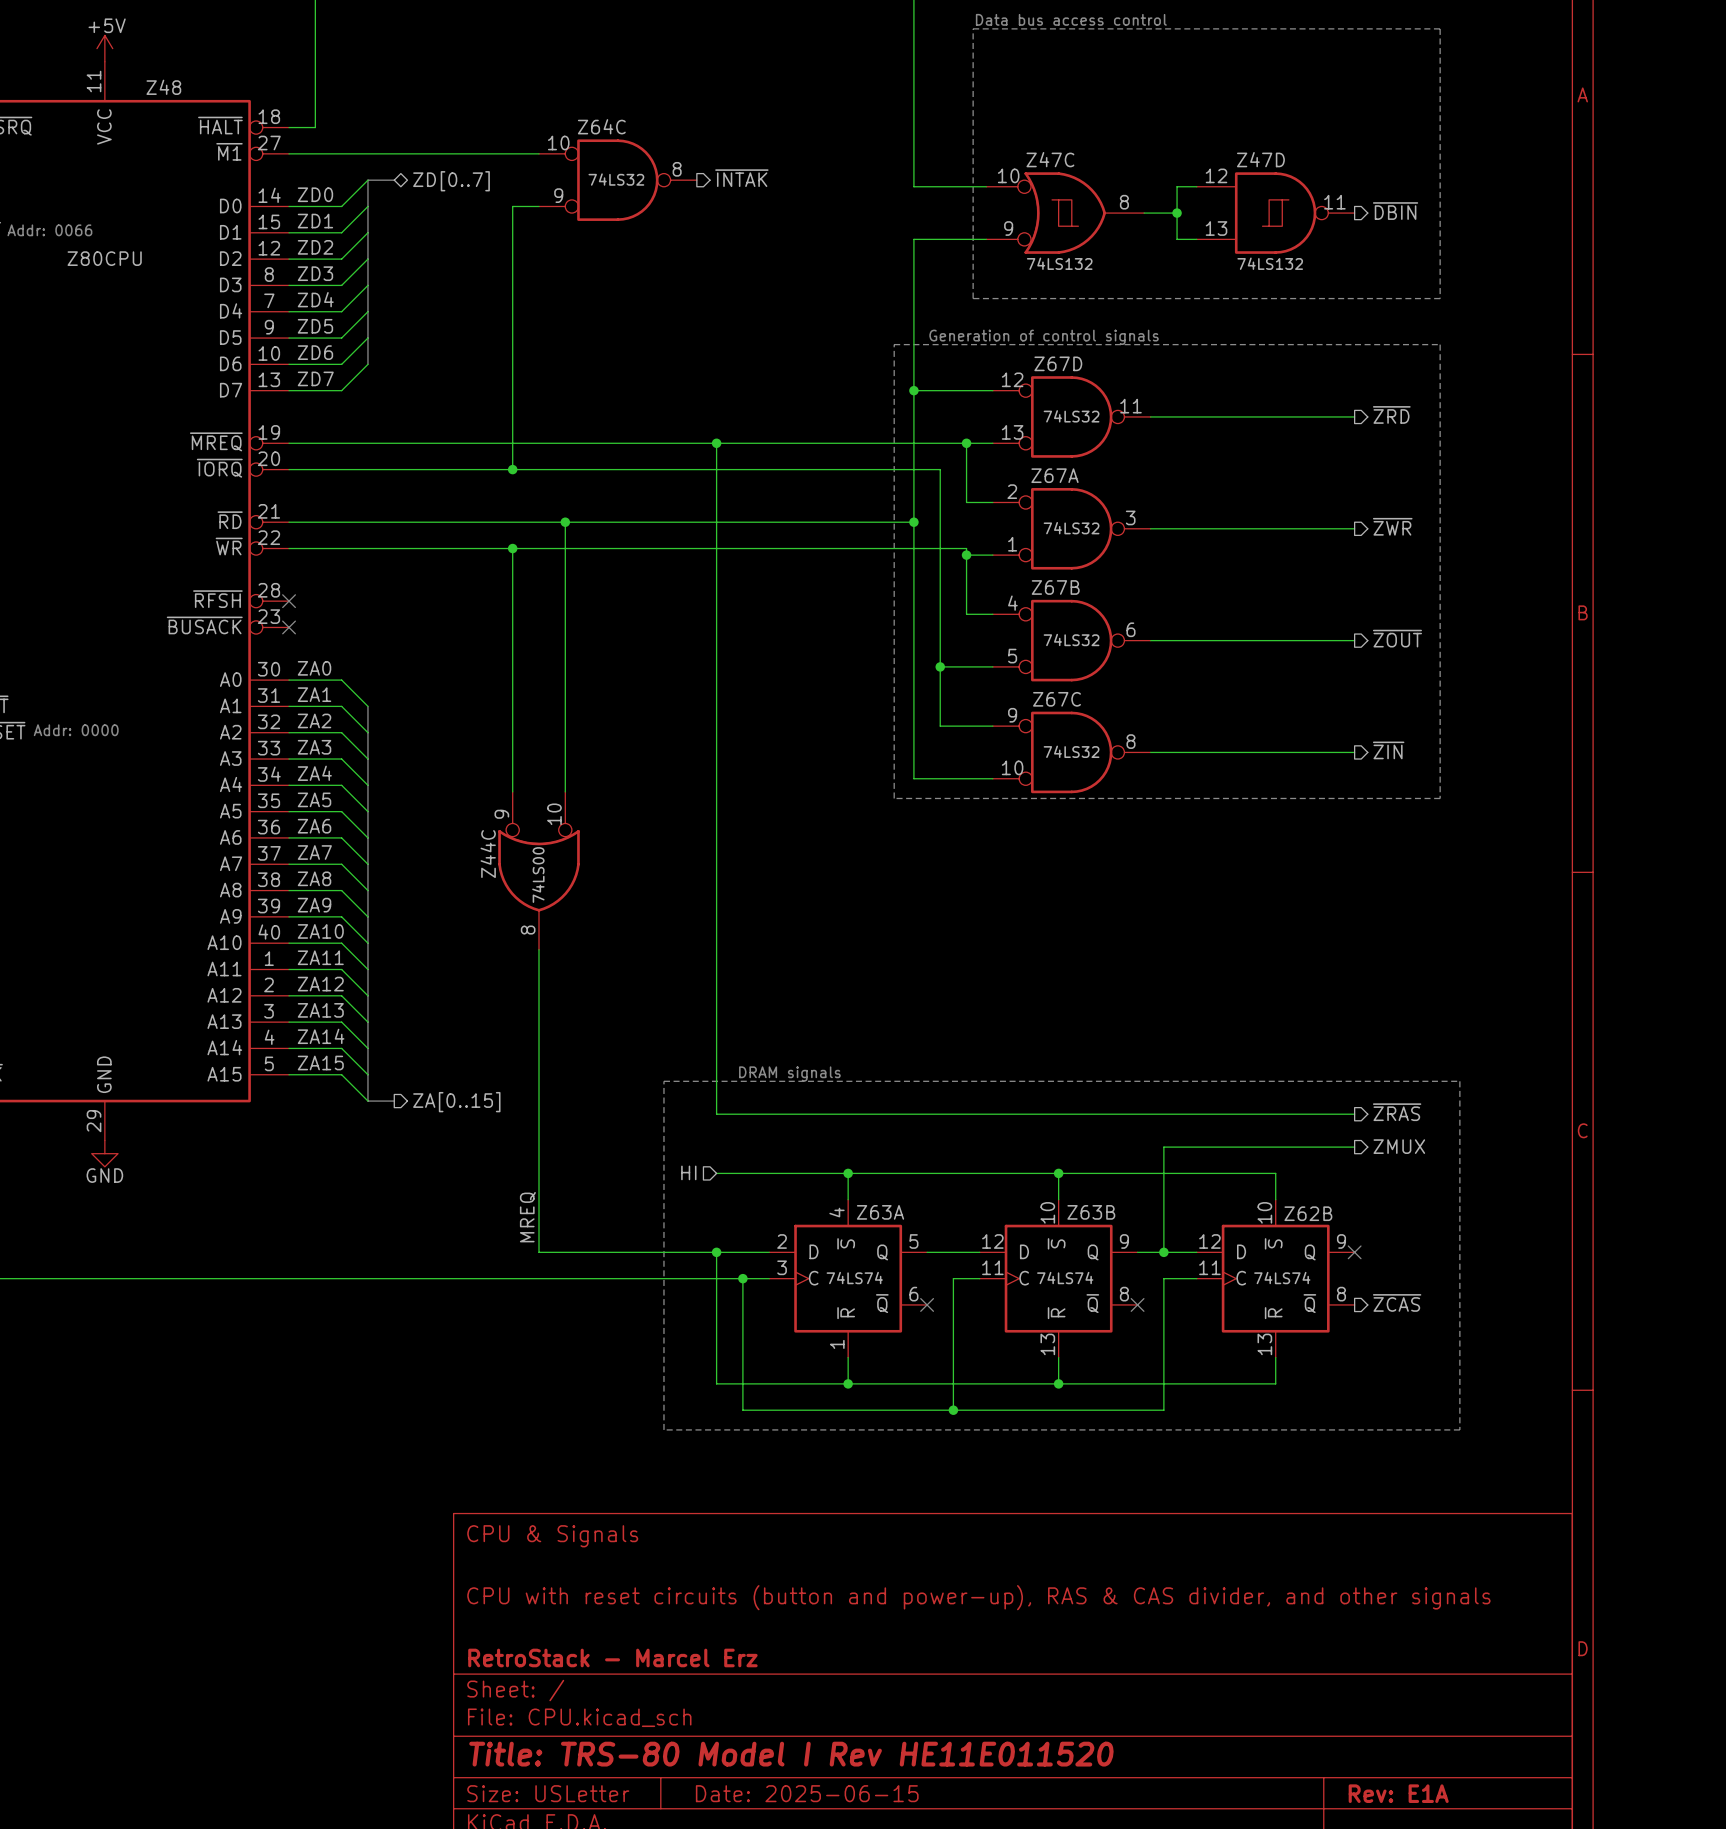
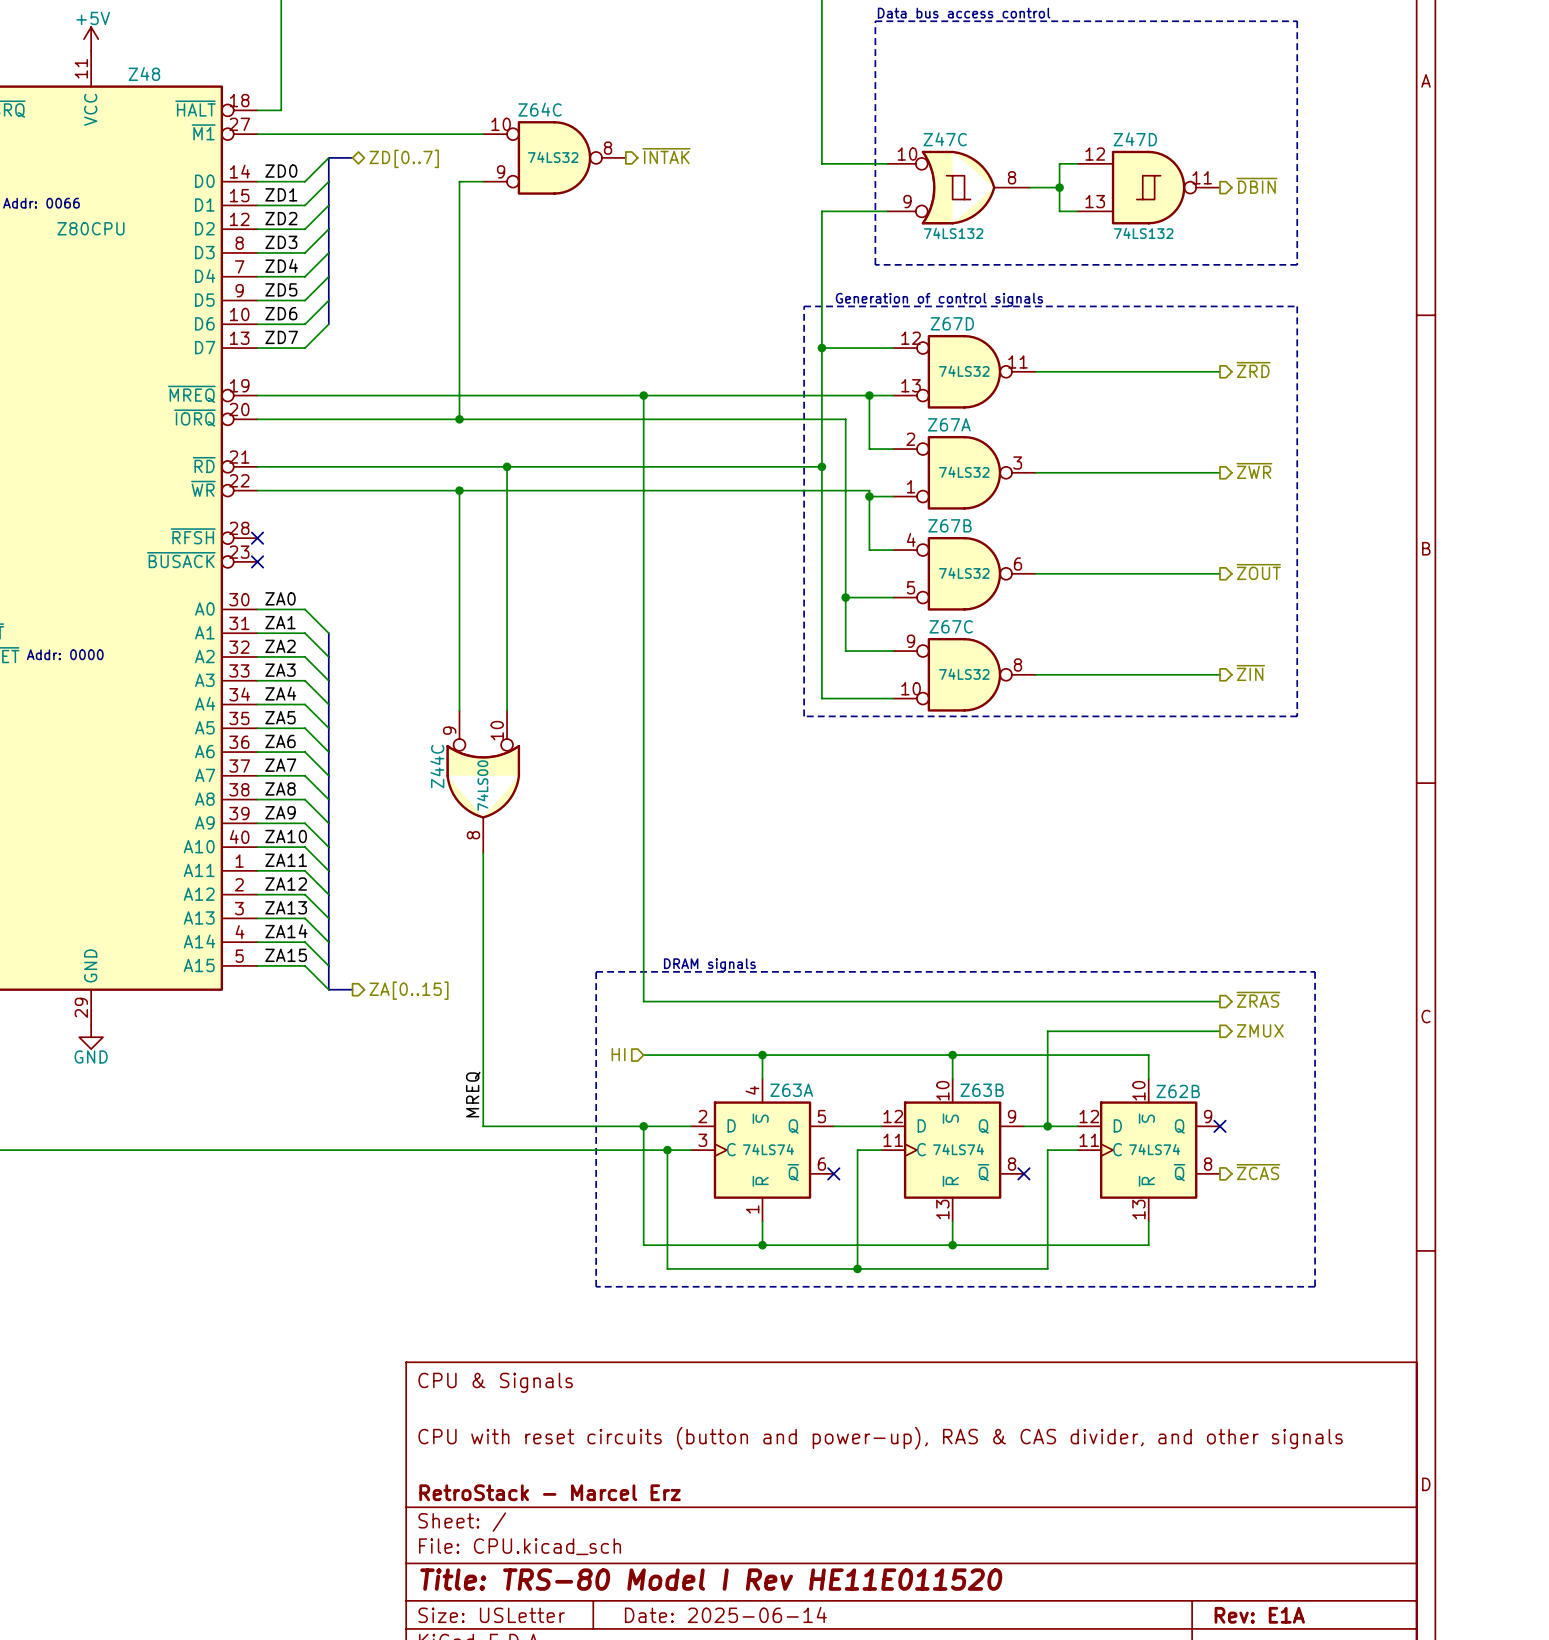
title block: Date: 2025-06-15 (807, 1793) -> Date: 2025-06-14 (725, 1614)

